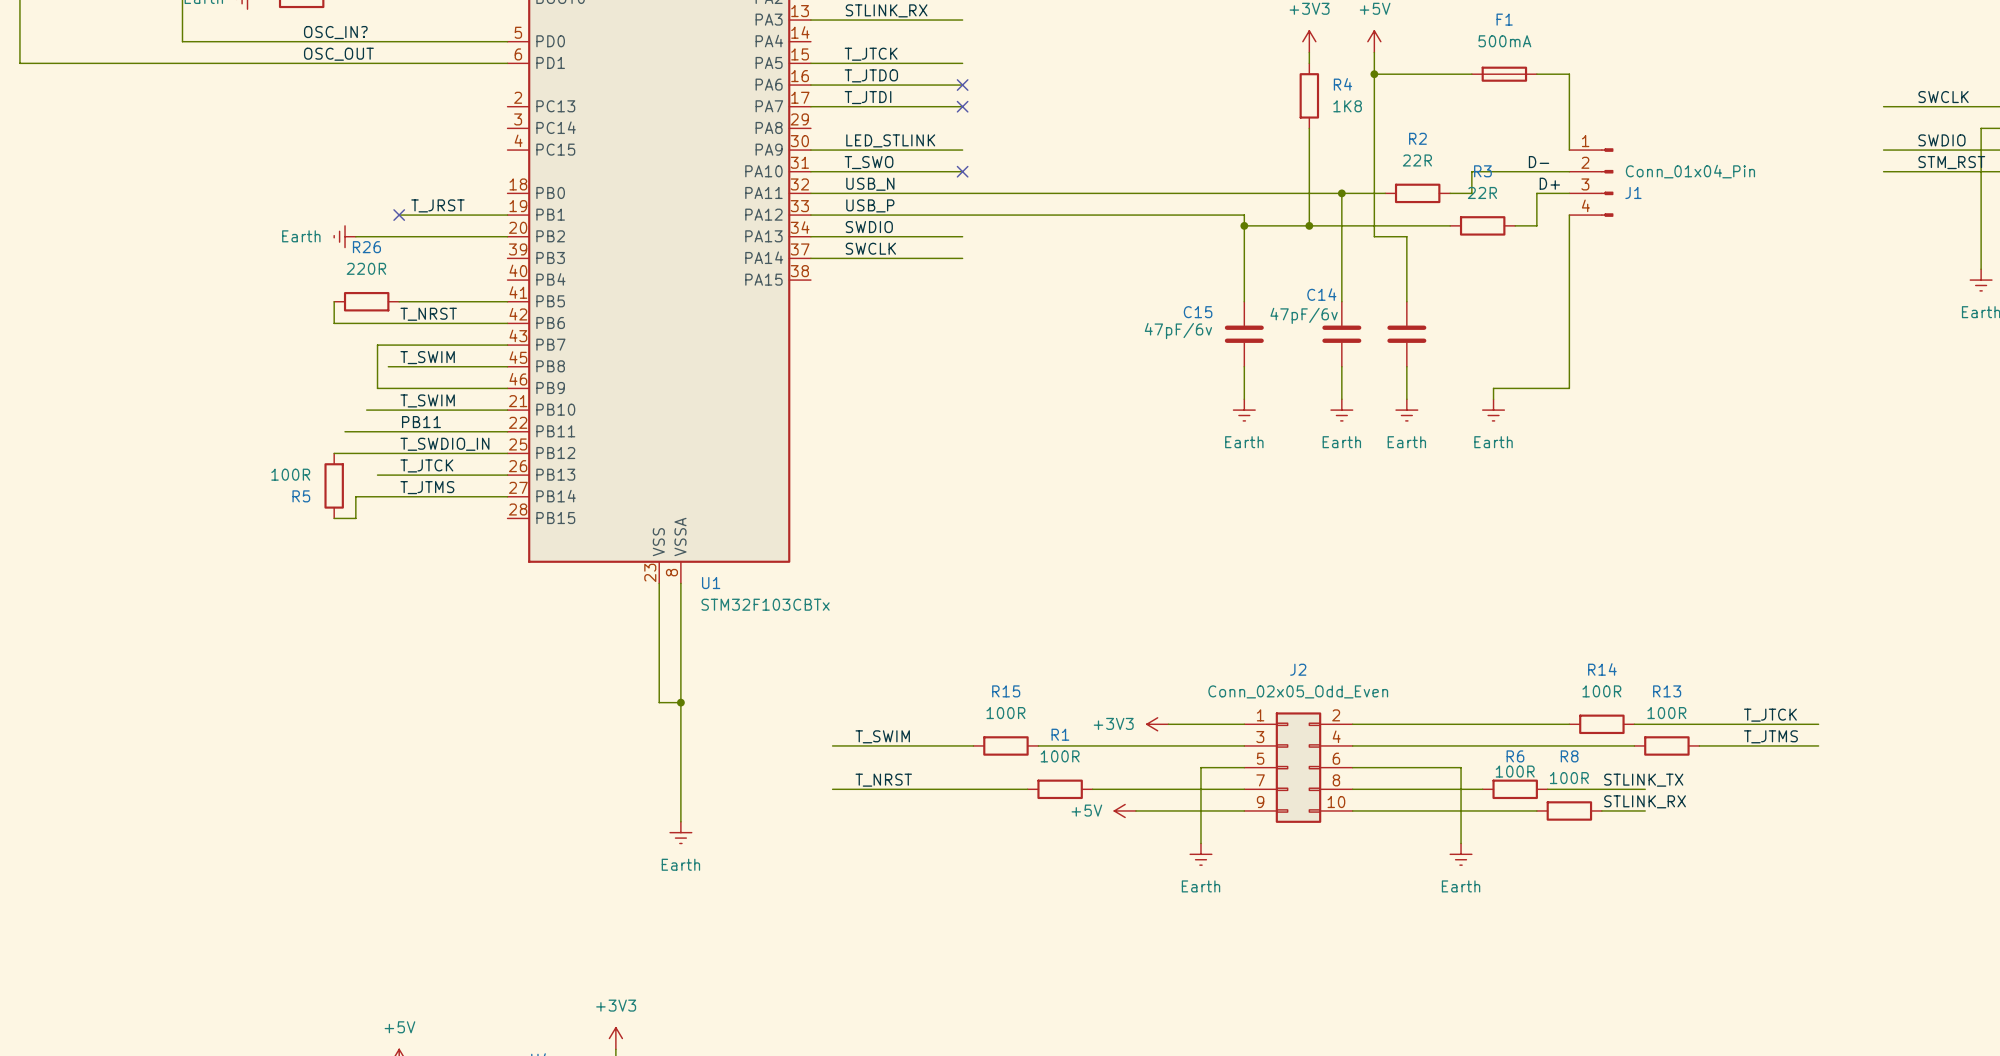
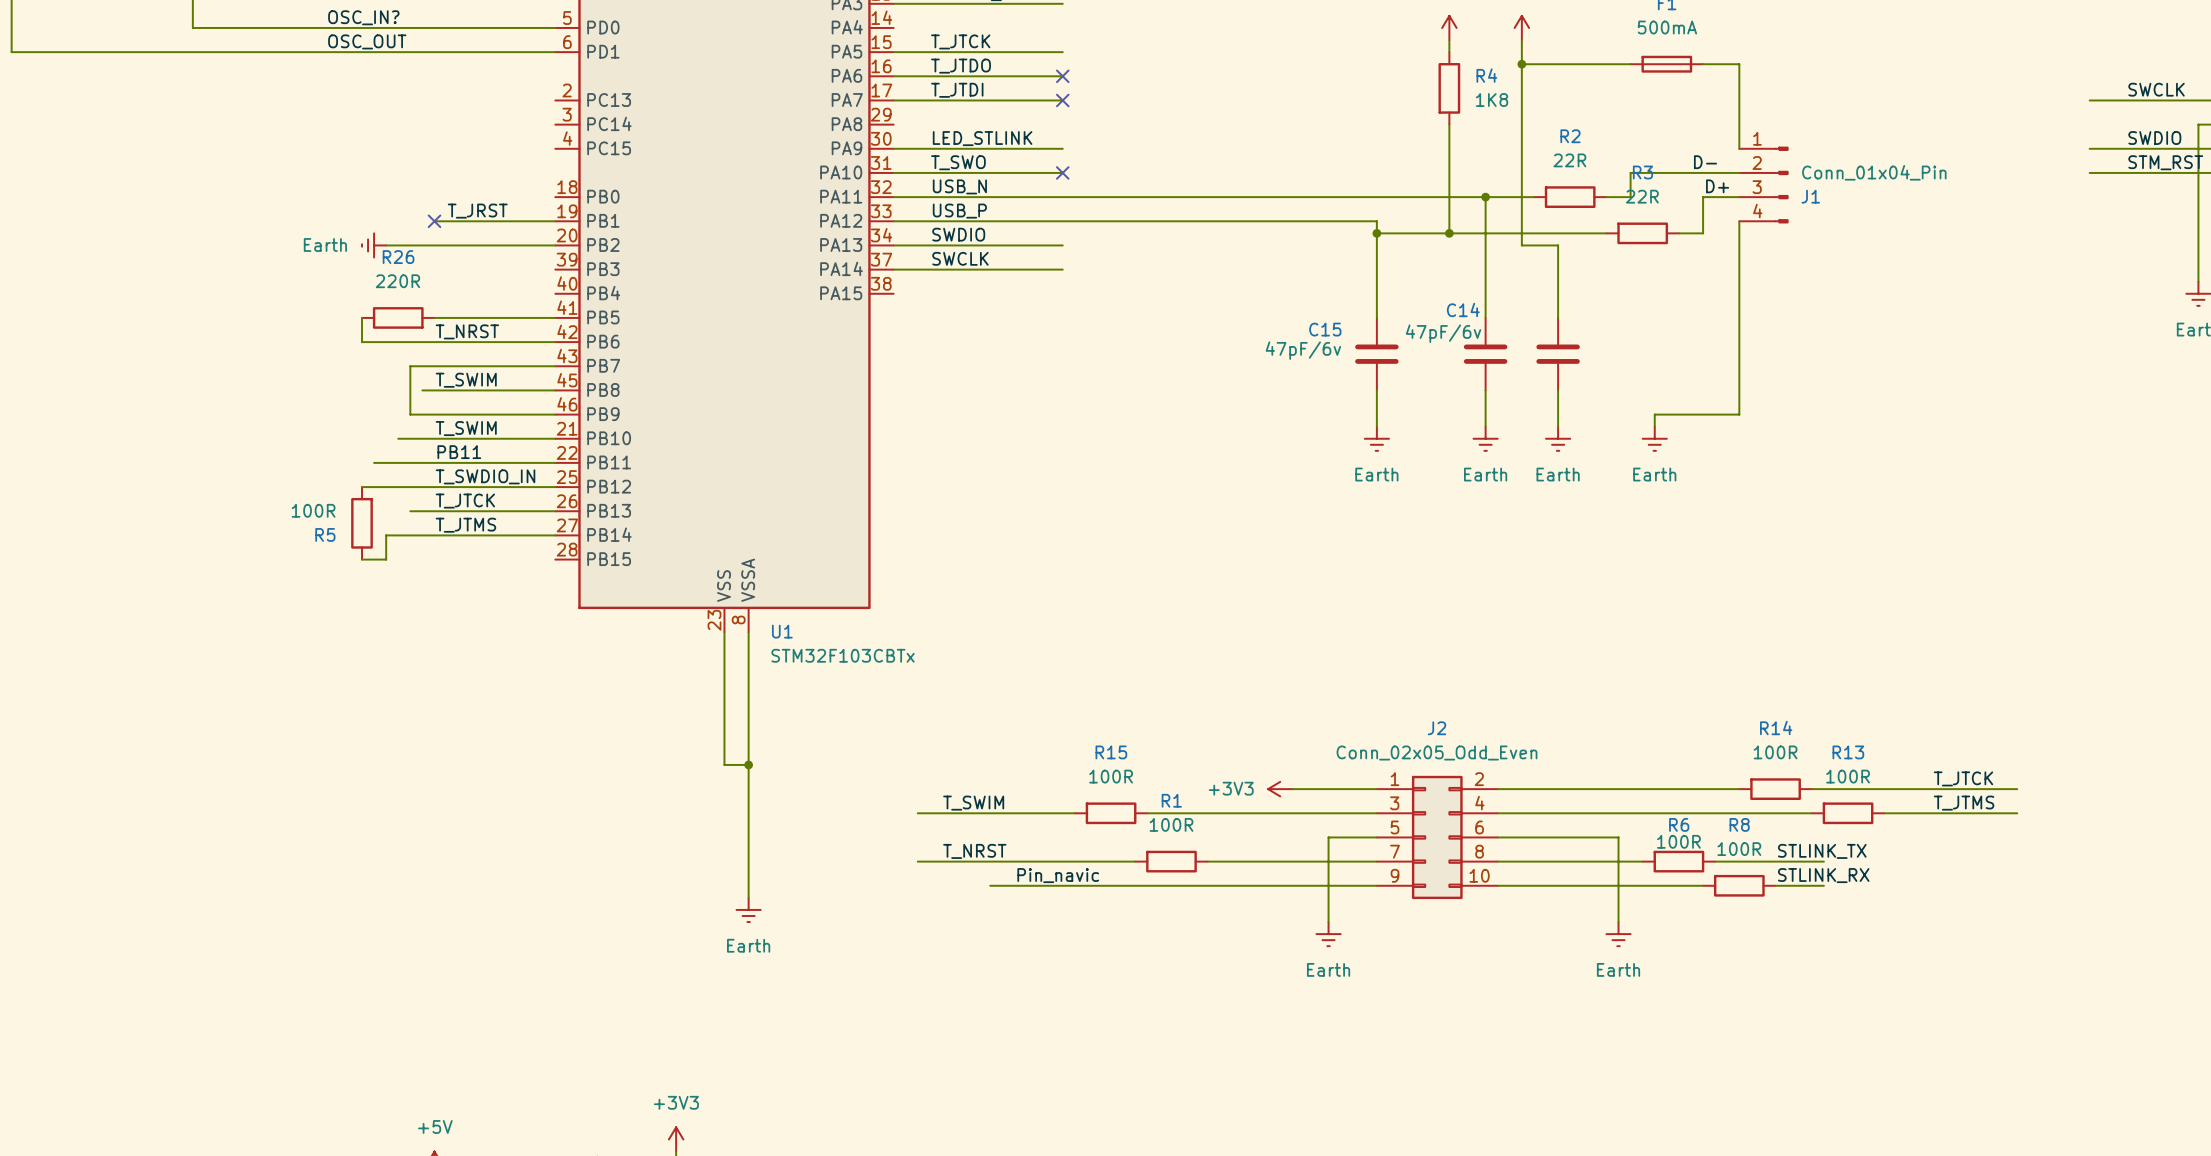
label: none -> Pin_navic (1058, 875)
wire: none -> (990, 885) (1256, 885)
power symbol: +5V (1125, 810) -> none

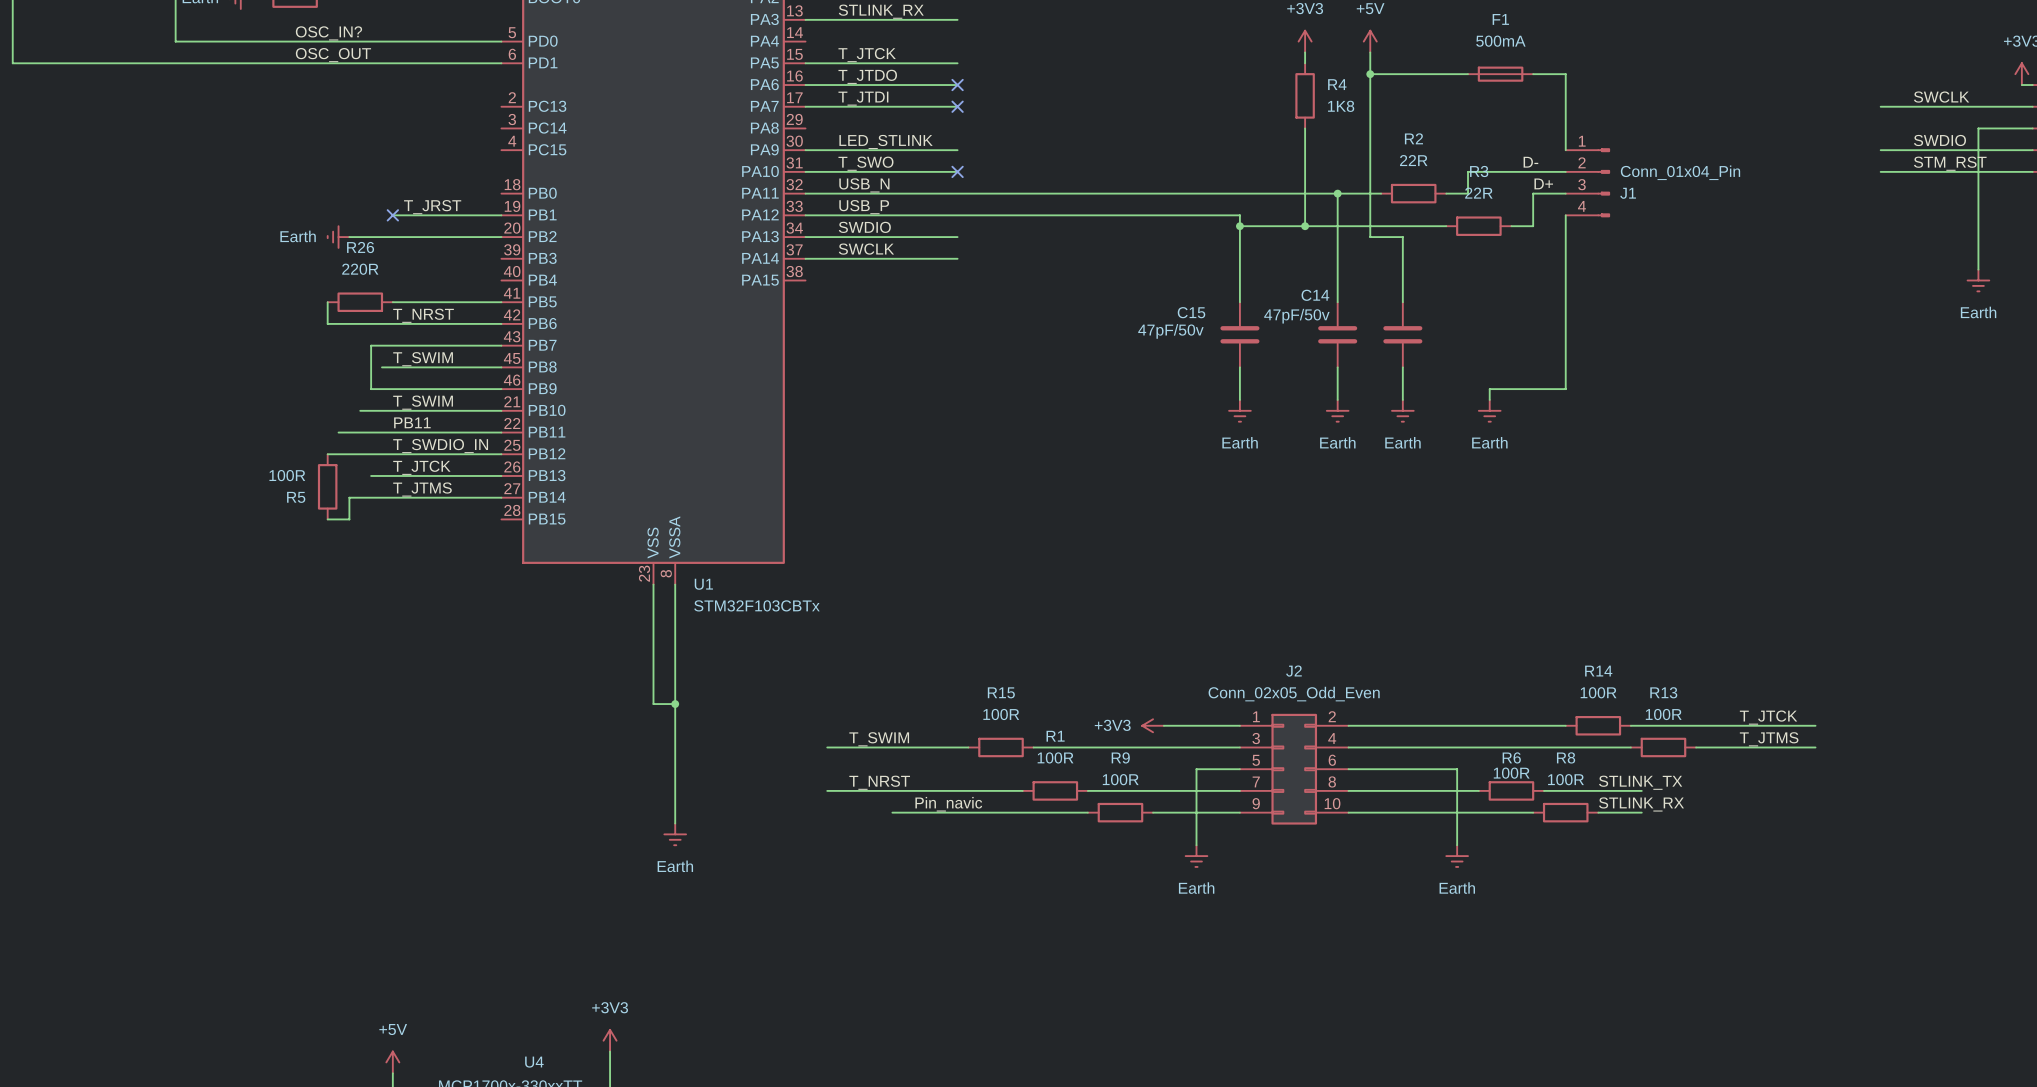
C14 value: 47pF/6v (1443, 333) -> 47pF/50v (1296, 316)
C15 value: 47pF/6v (1303, 350) -> 47pF/50v (1170, 331)
wire: (1207, 885) (1280, 885) -> none
R9: none -> 100R (1120, 812)

